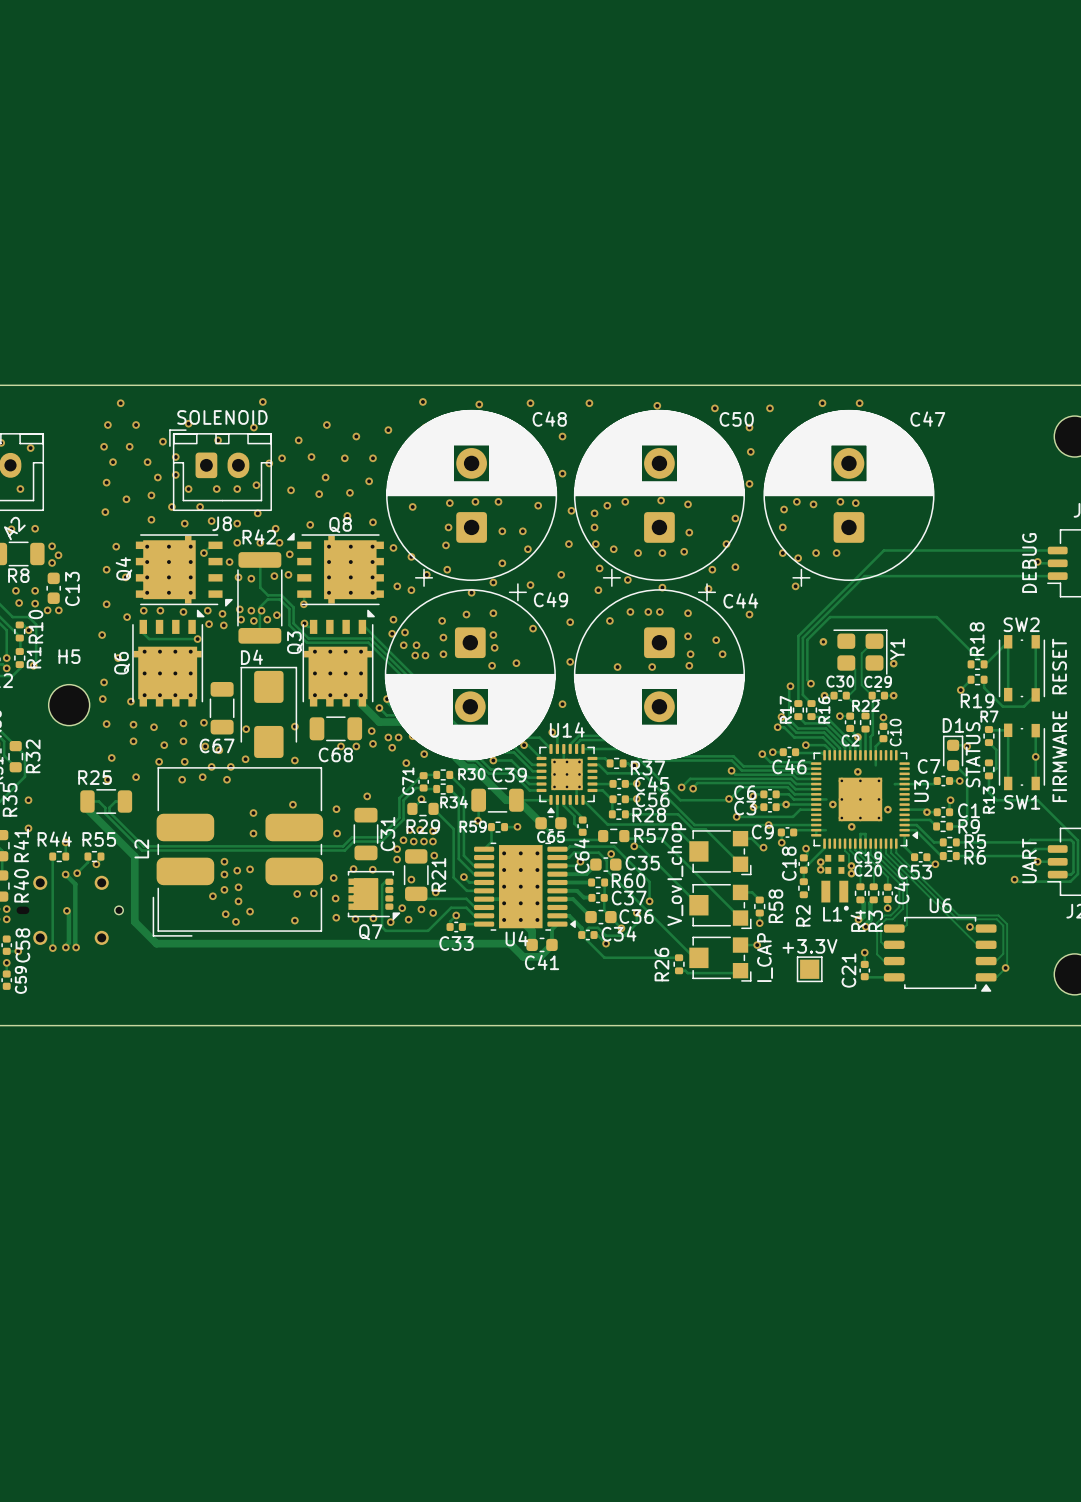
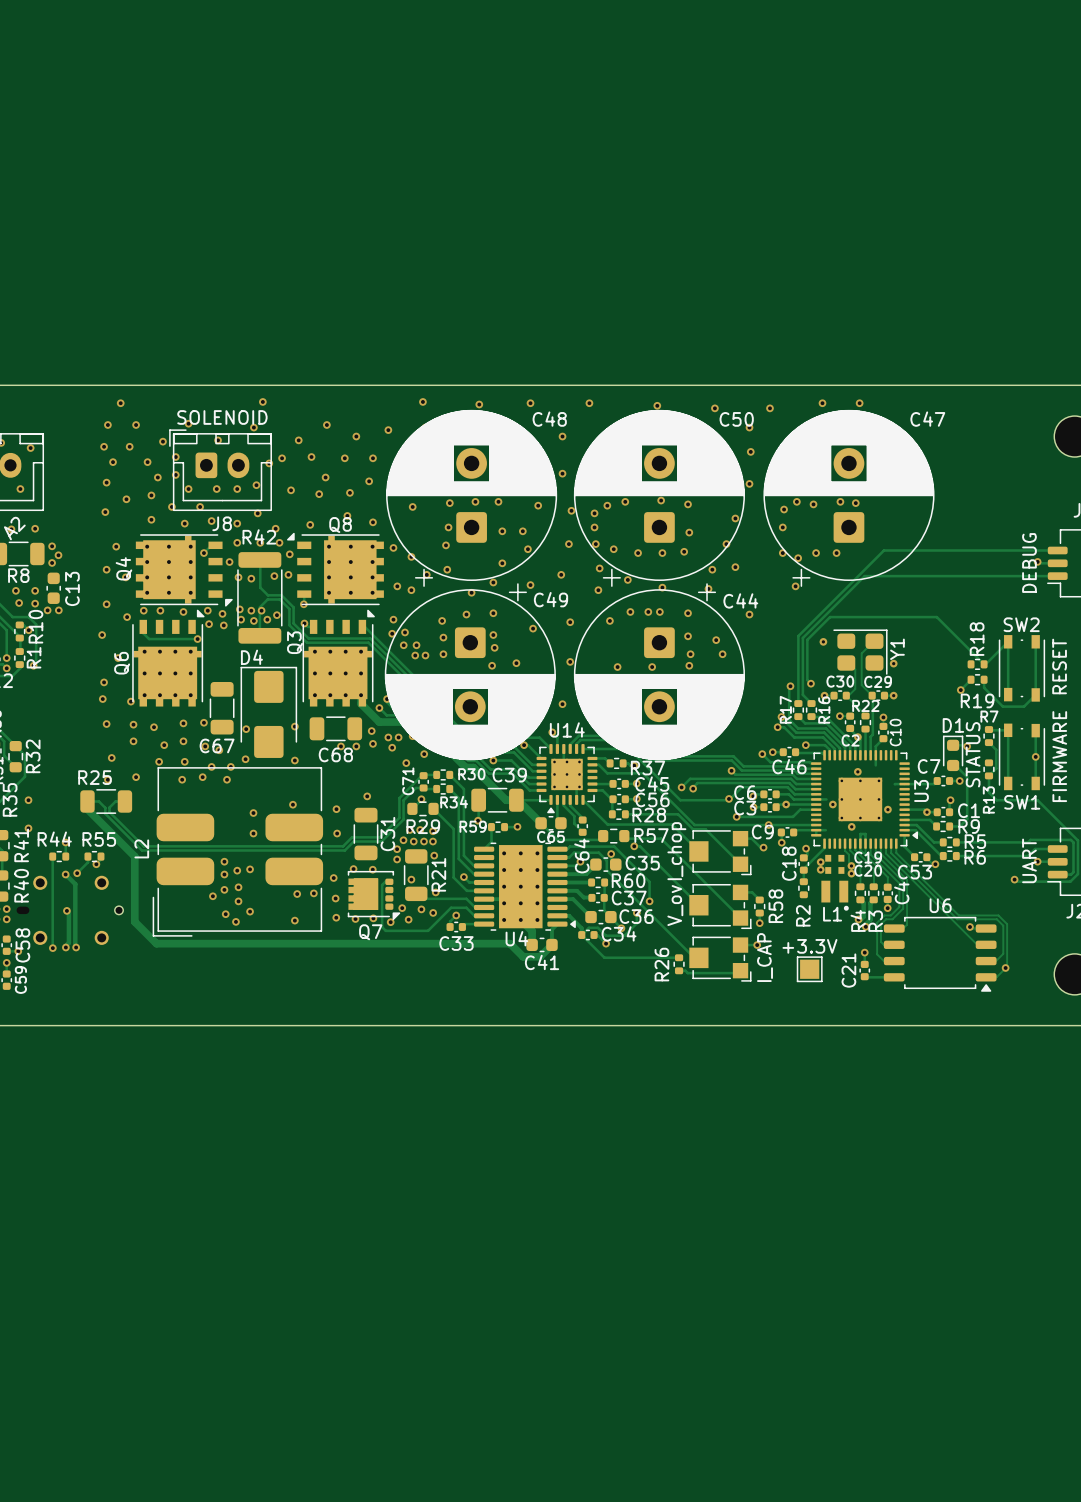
H5: (69, 705) -> none

